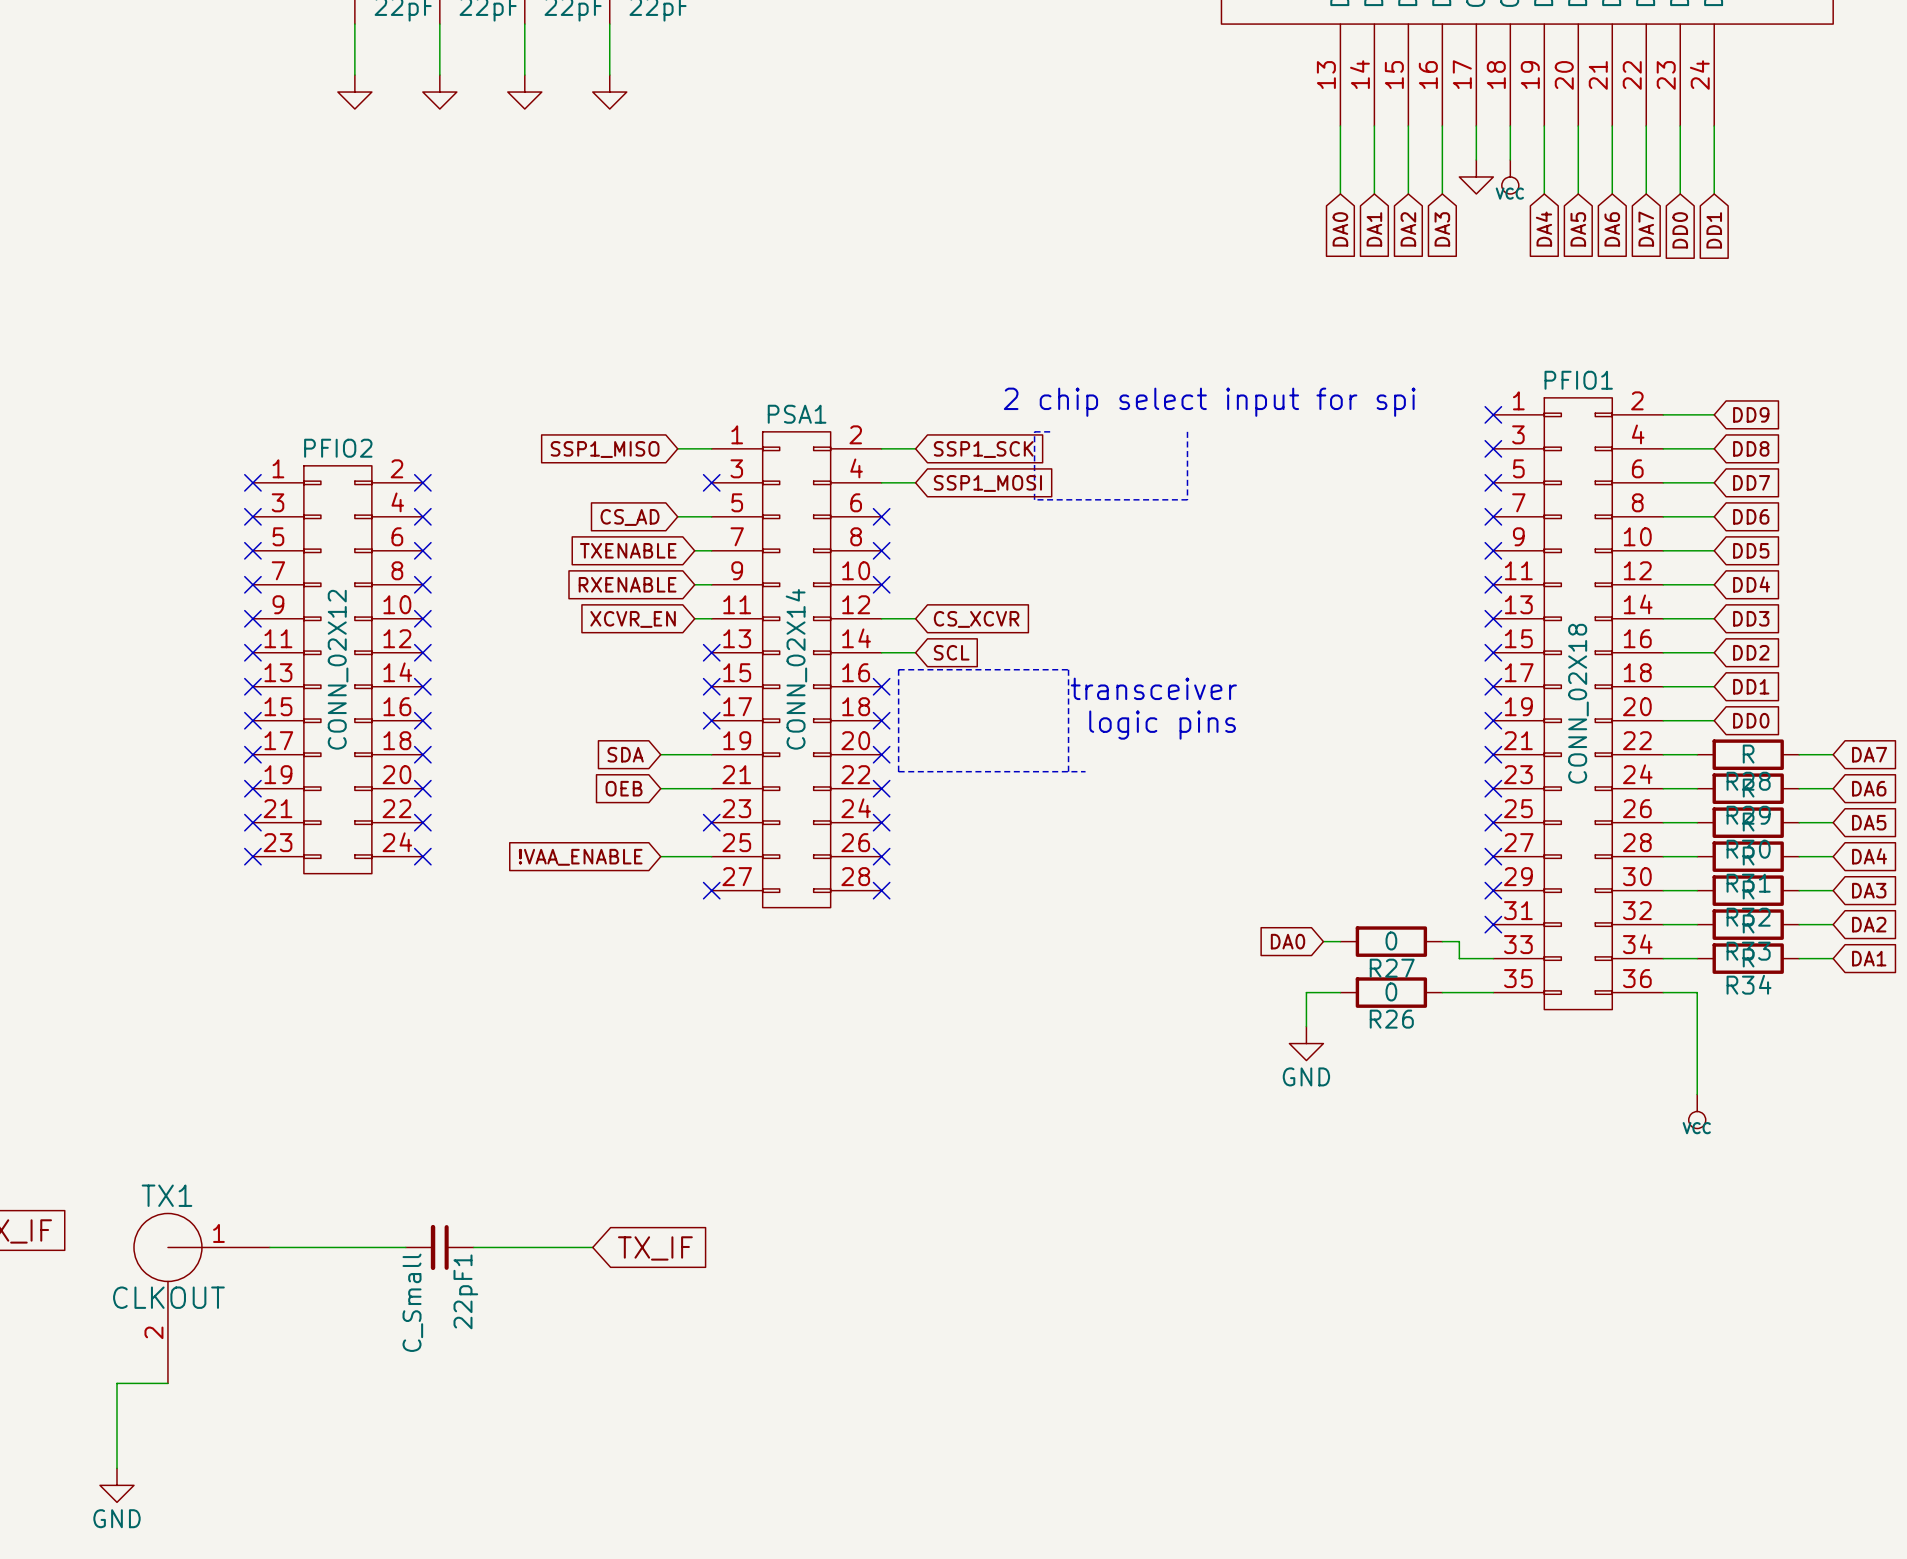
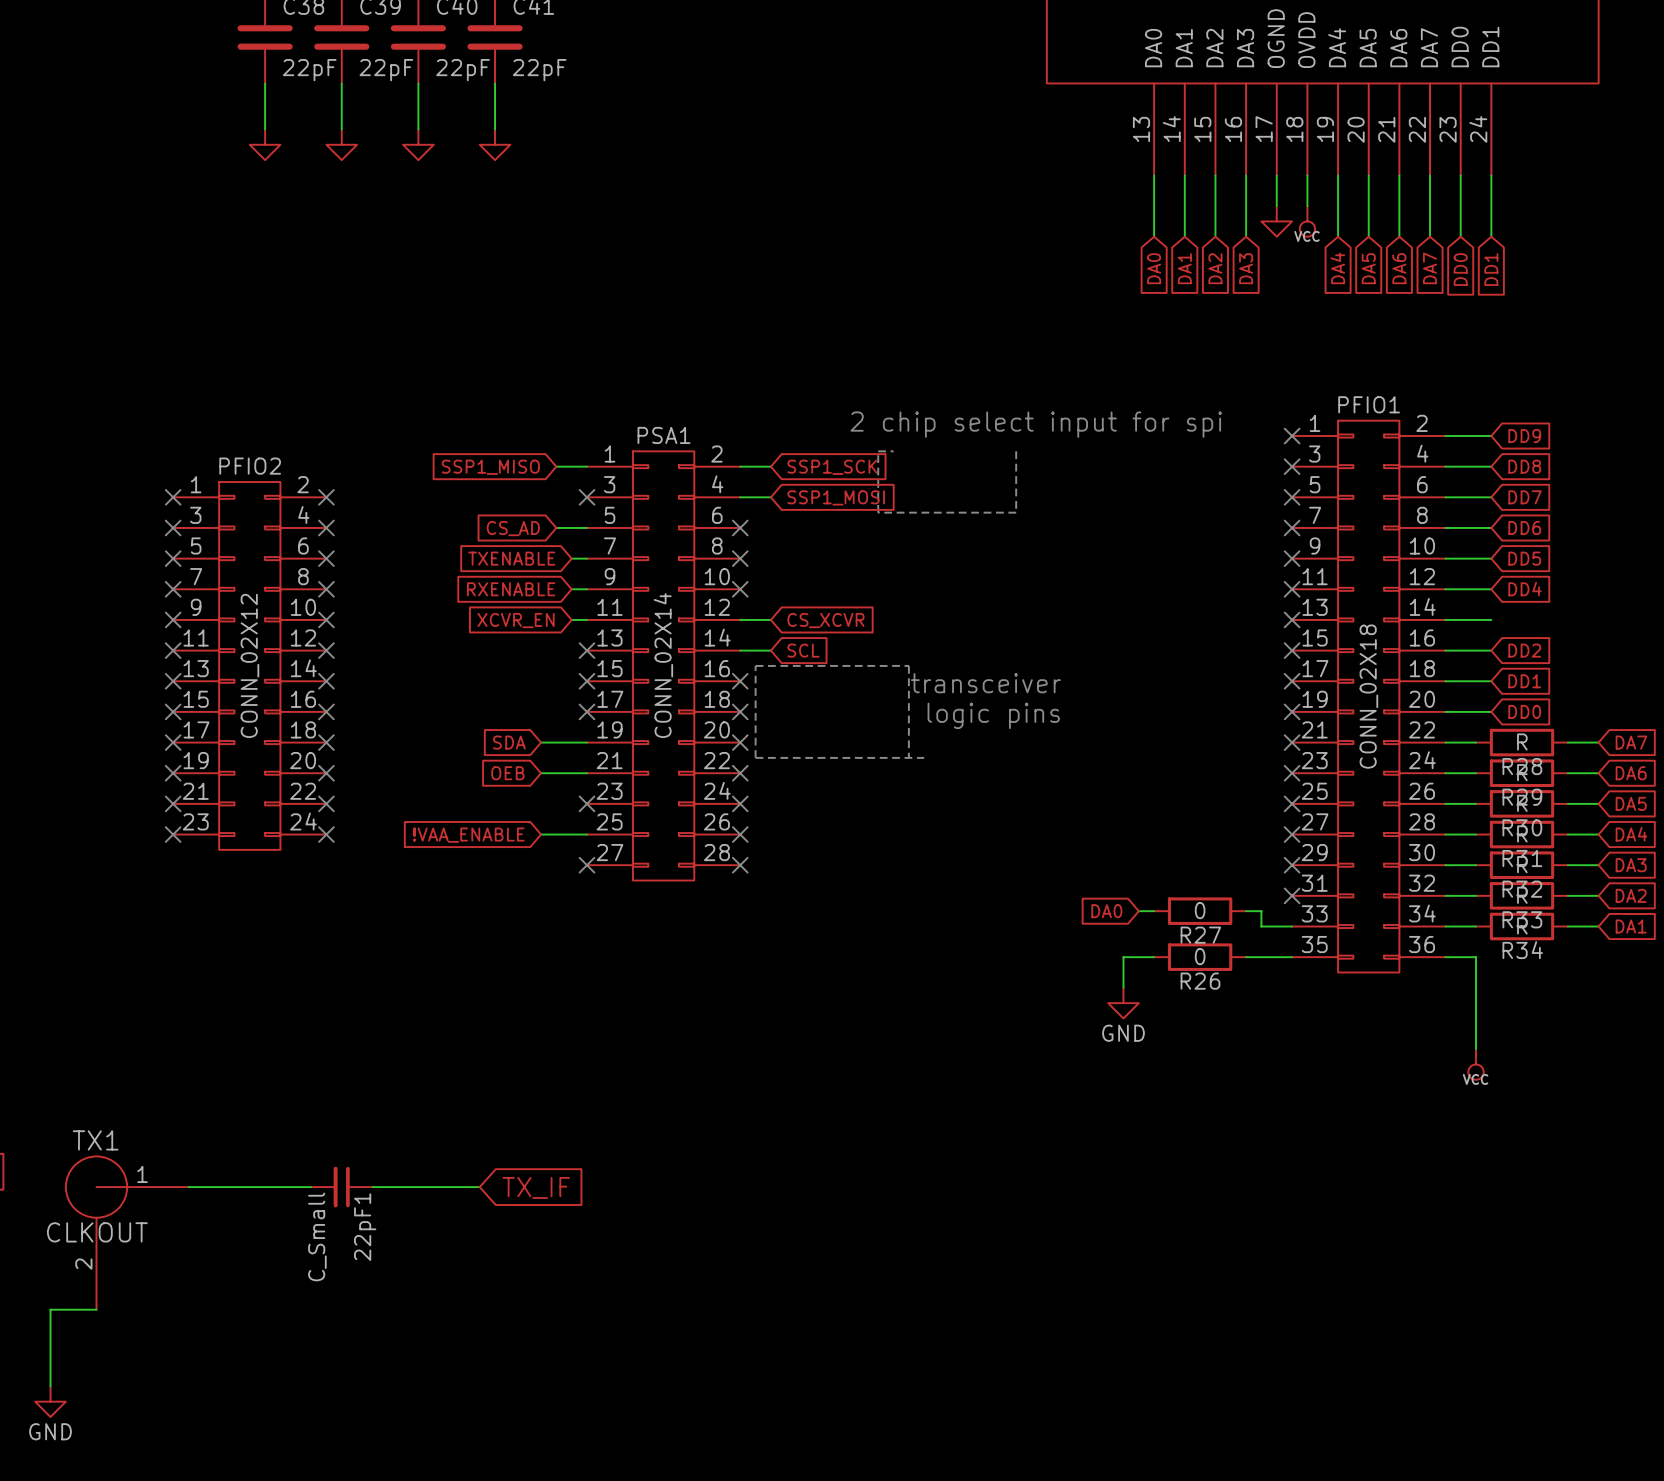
global label: DD3 (1751, 618) -> none

